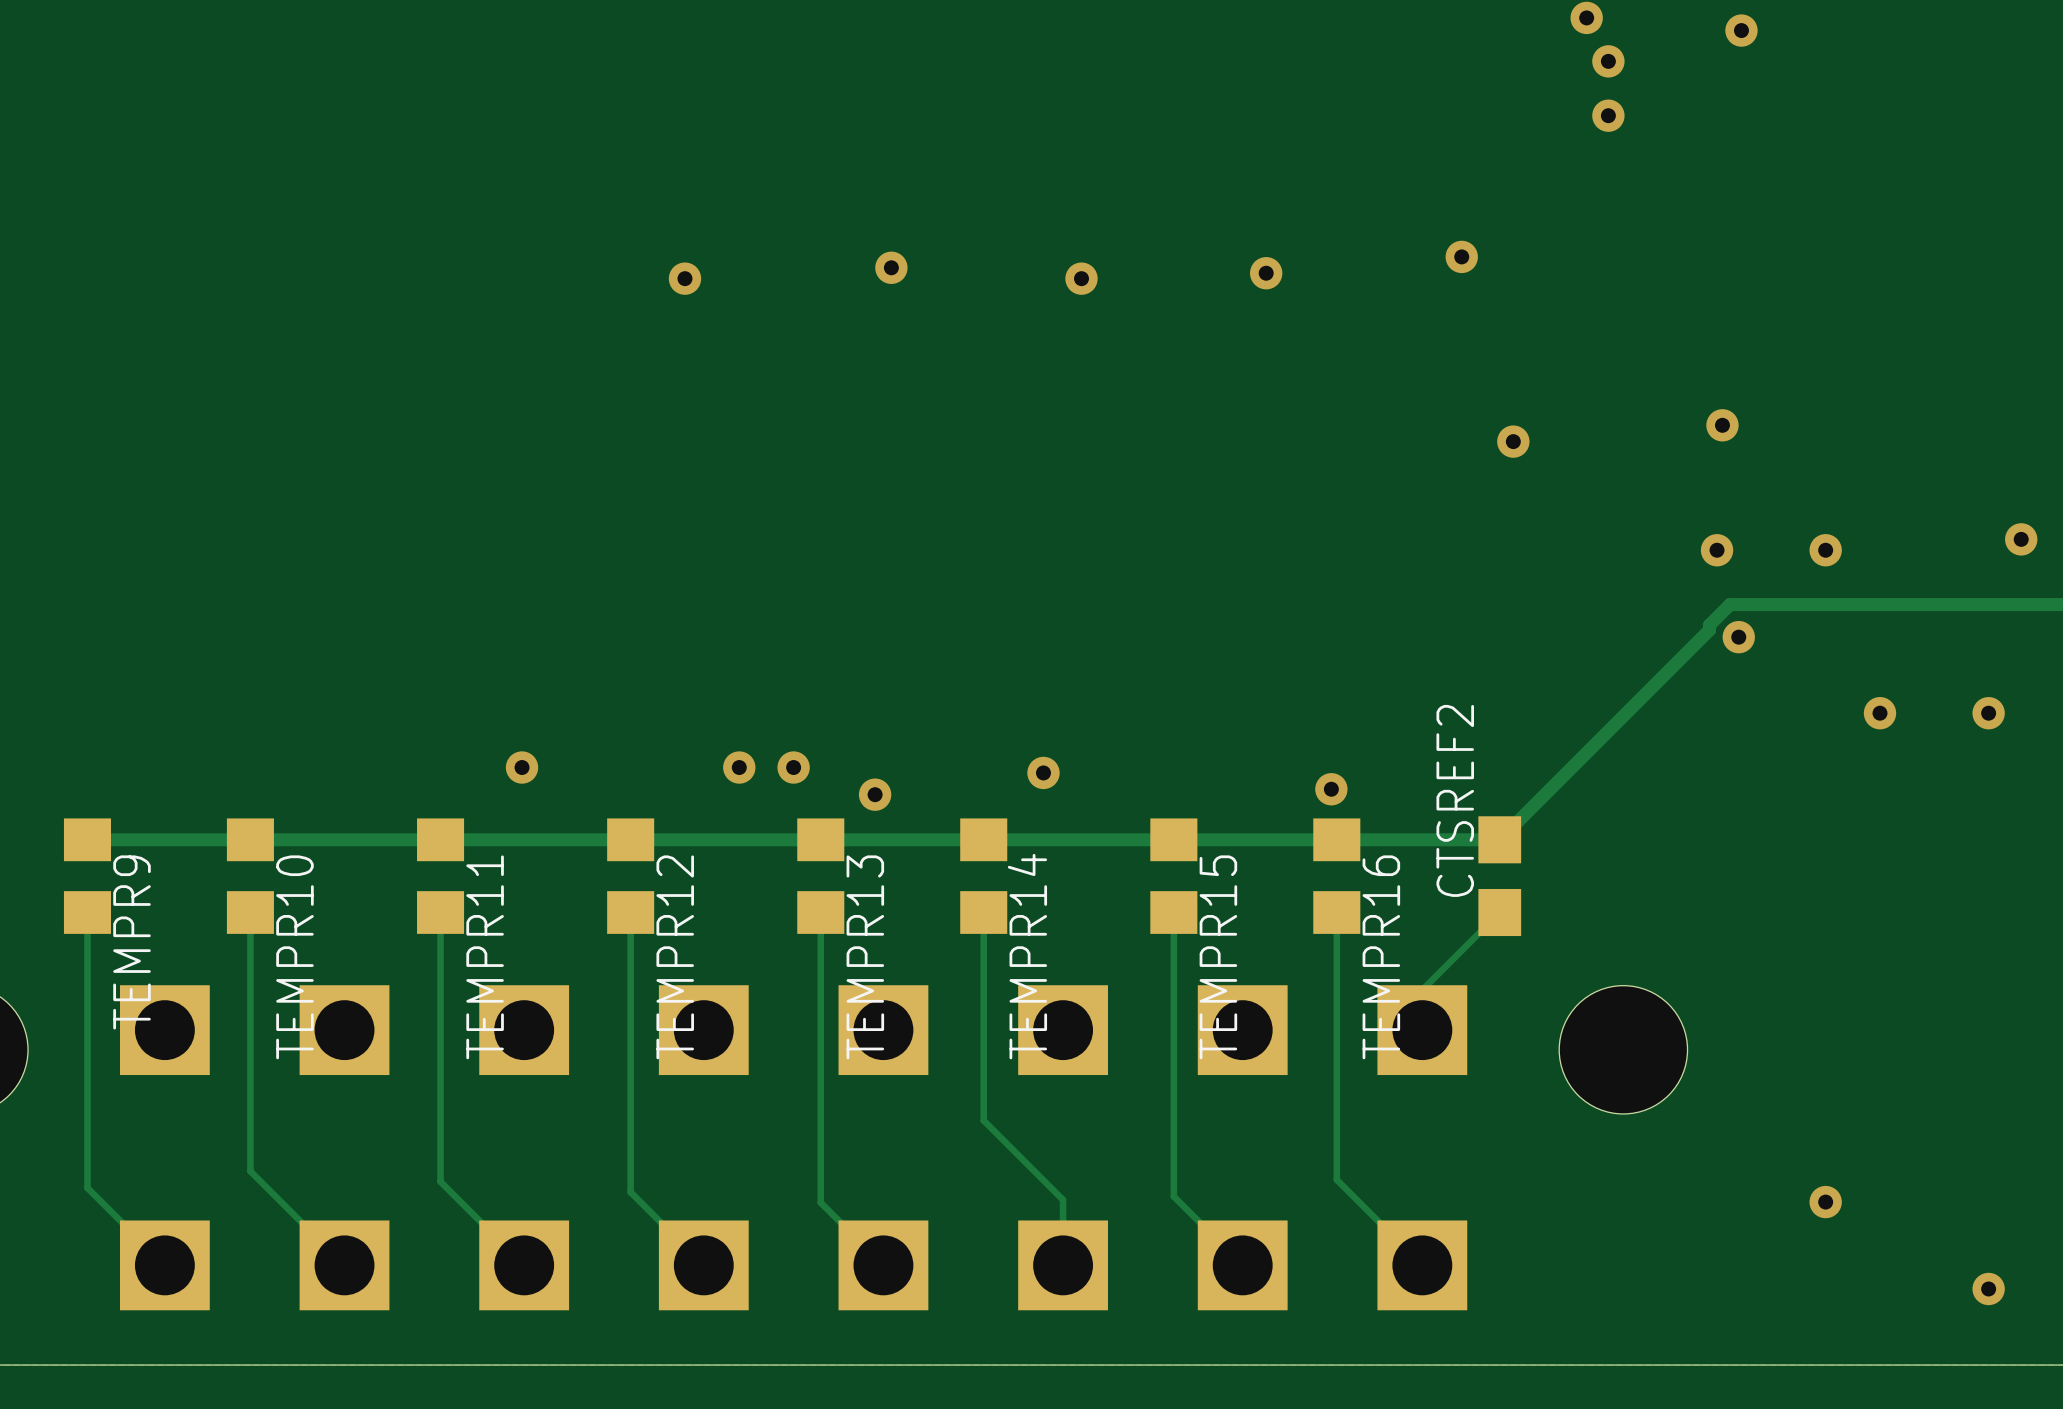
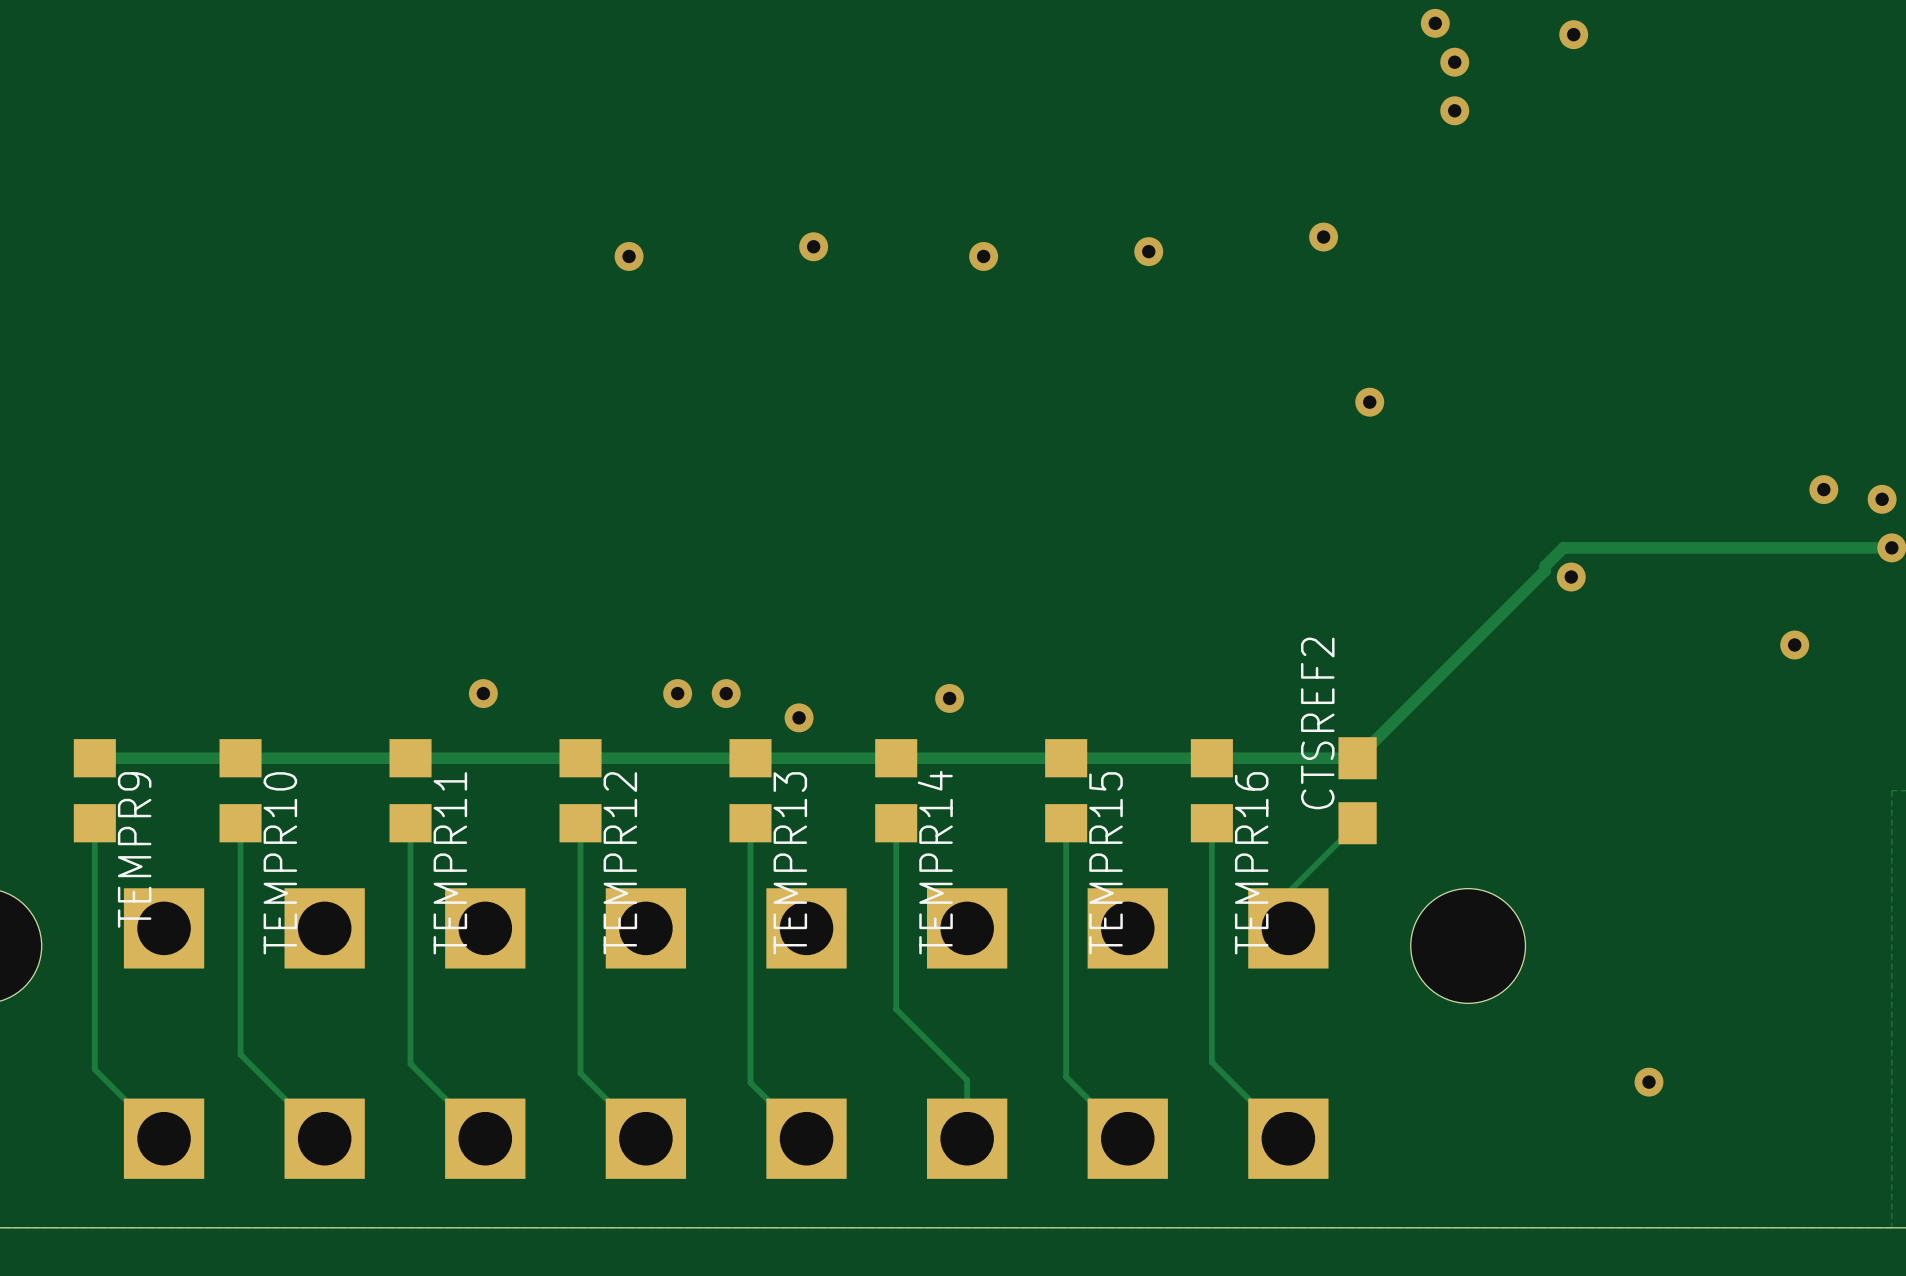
via: (1722, 425) -> none
via: (1717, 550) -> none
via: (1825, 550) -> none
via: (1879, 713) -> none
via: (1331, 789) -> none
via: (1988, 1288) -> none

